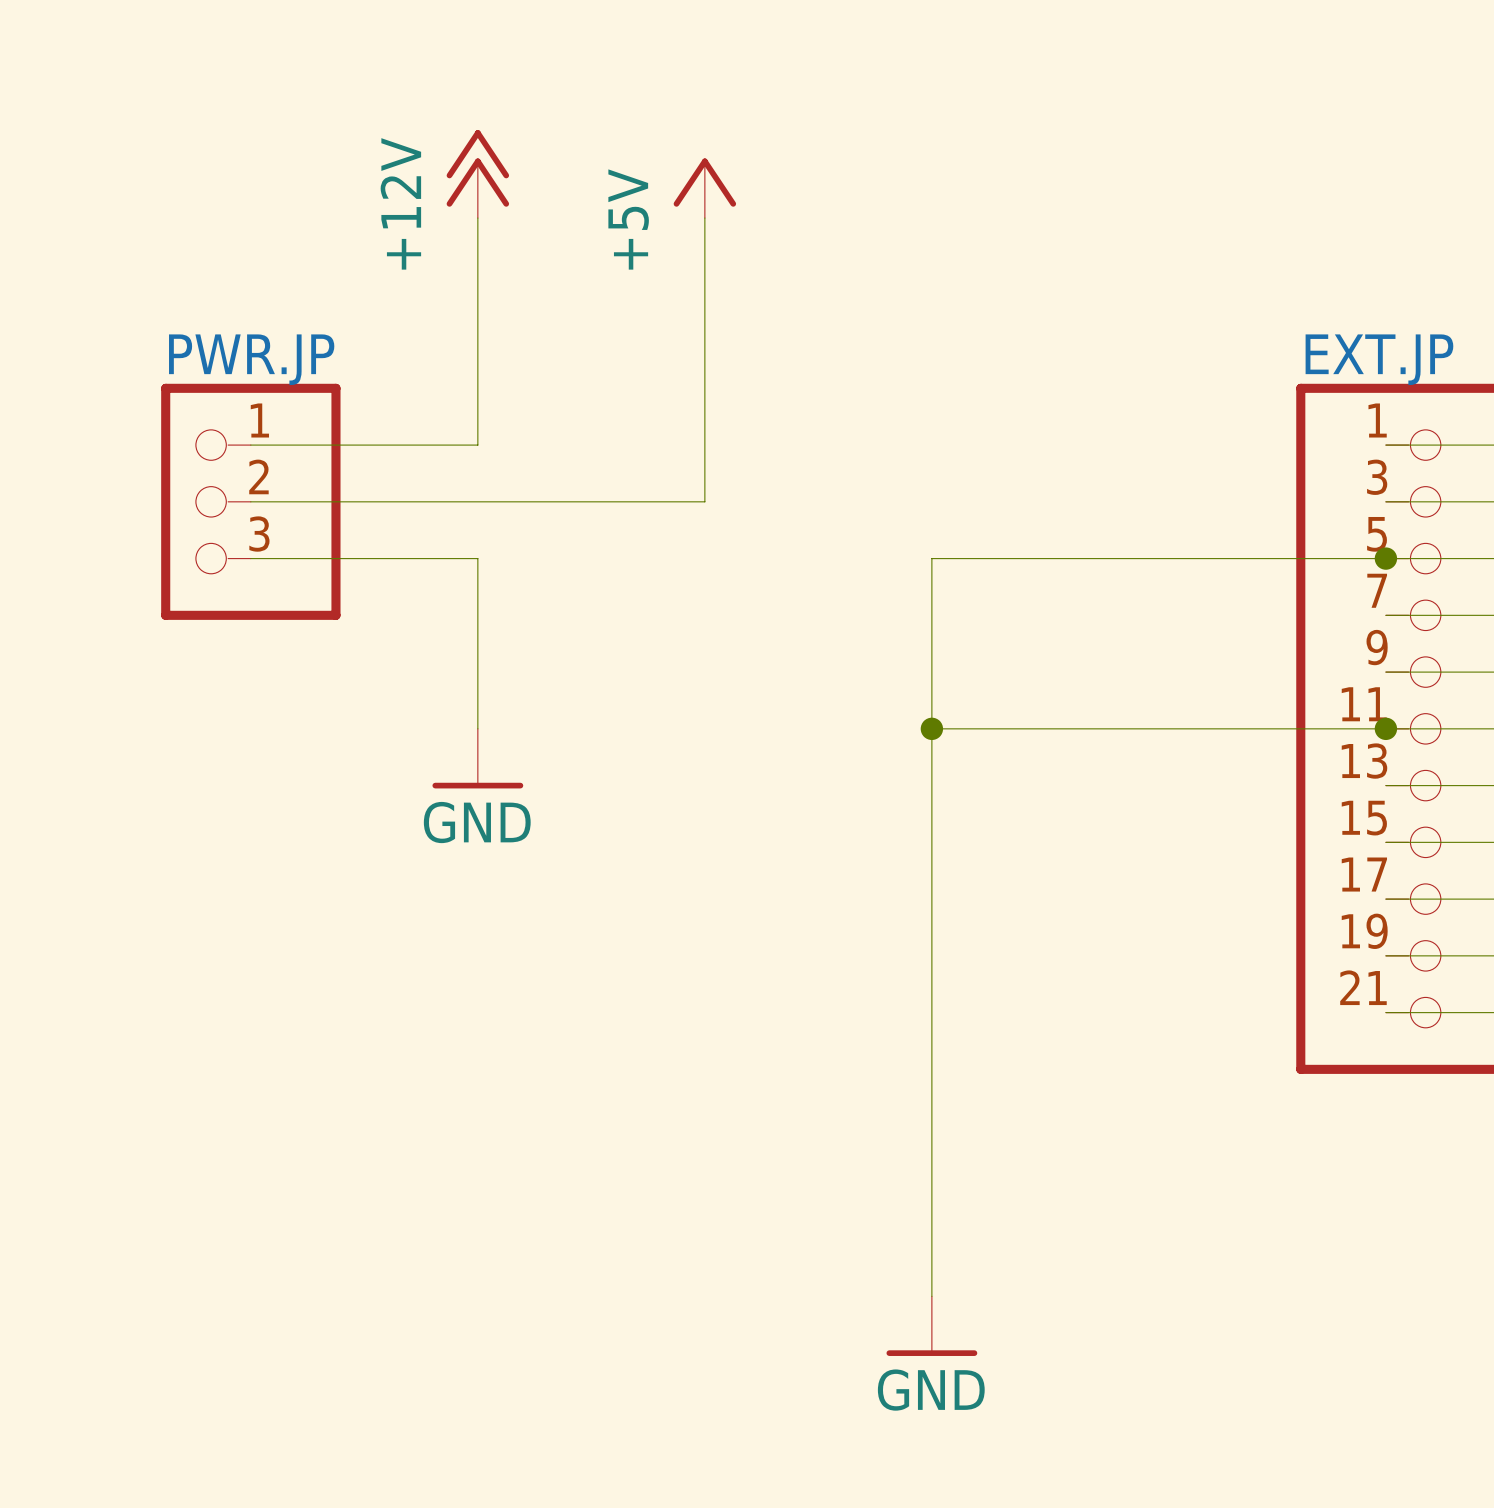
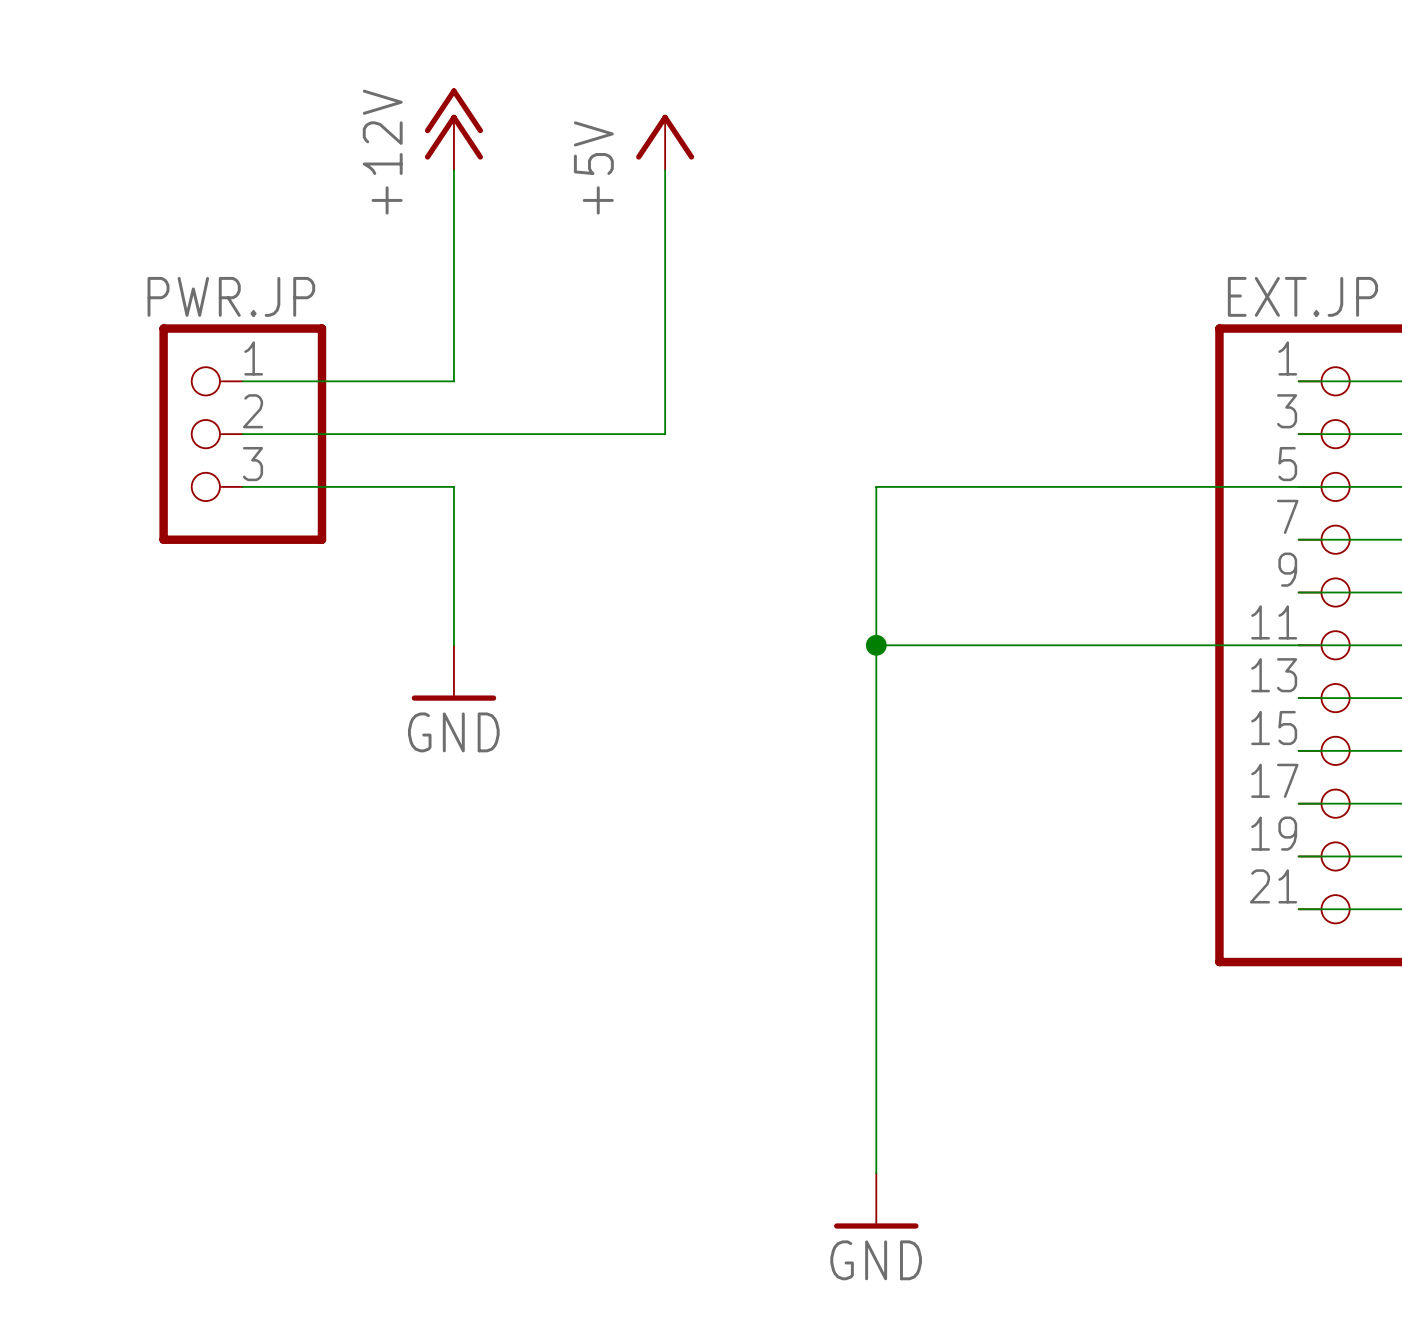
junction: (1385, 558) -> none
junction: (1385, 728) -> none

